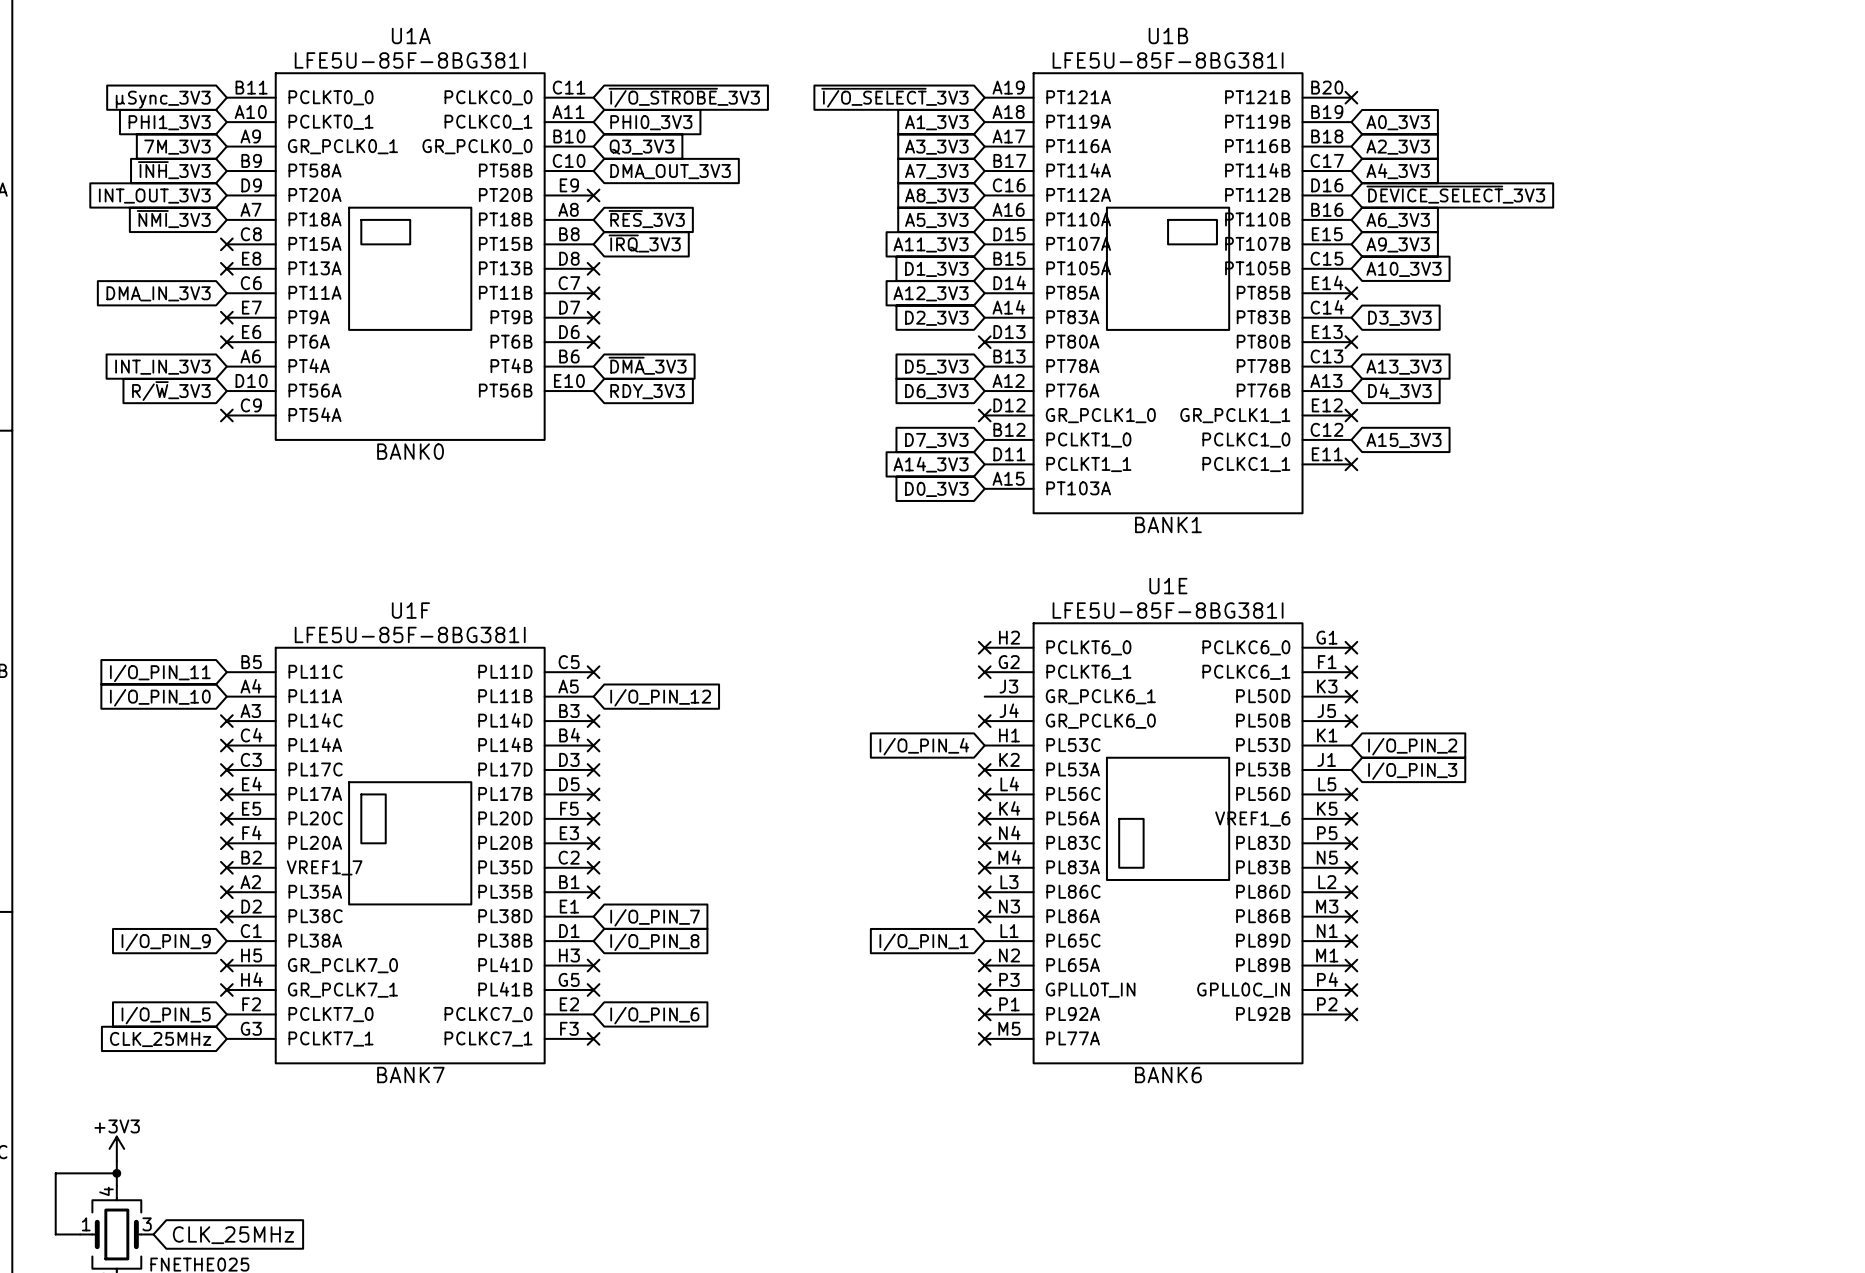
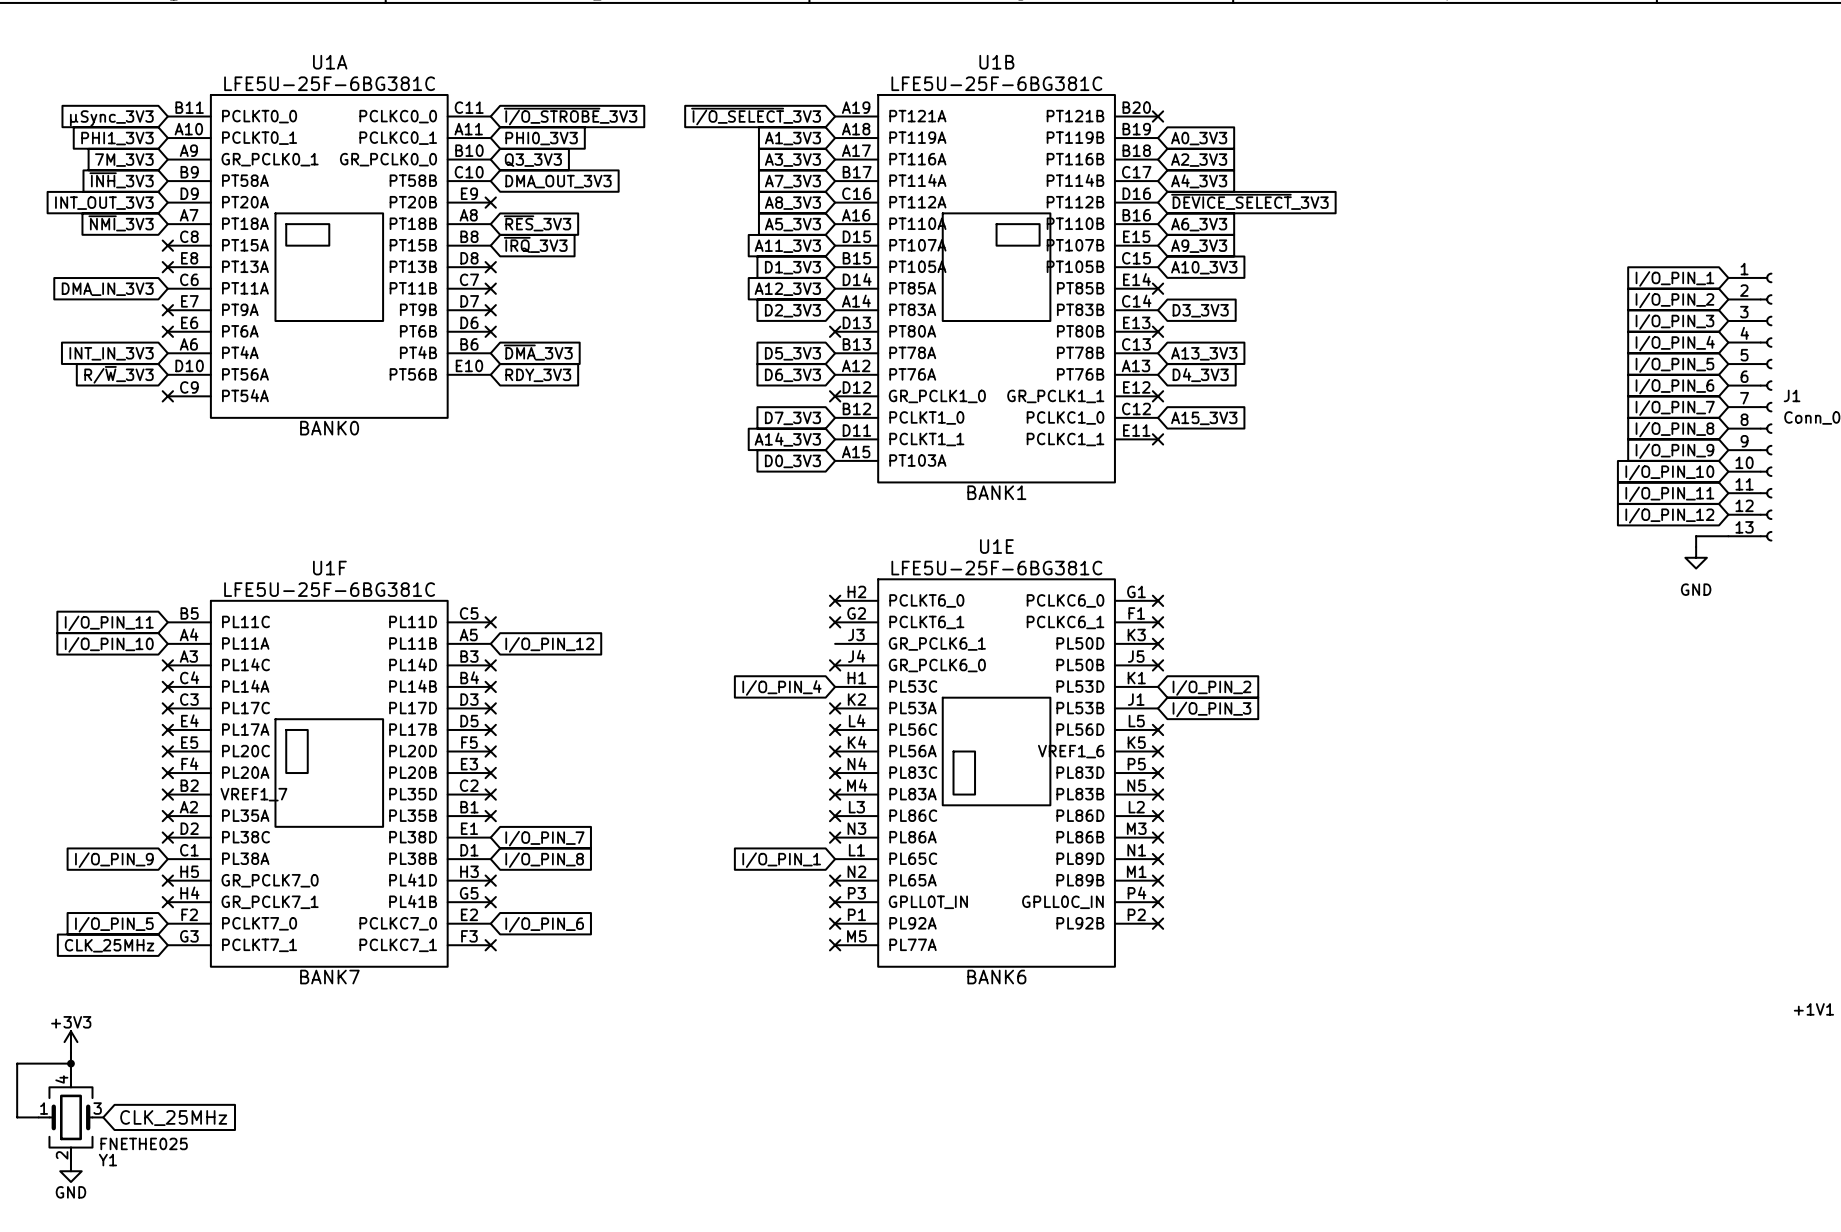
U1A value: LFE5U-85F-8BG381I (410, 60) -> LFE5U-25F-6BG381C (329, 83)
U1B value: LFE5U-85F-8BG381I (1168, 60) -> LFE5U-25F-6BG381C (996, 83)
U1E value: LFE5U-85F-8BG381I (1168, 610) -> LFE5U-25F-6BG381C (996, 568)
U1F value: LFE5U-85F-8BG381I (410, 634) -> LFE5U-25F-6BG381C (329, 589)

